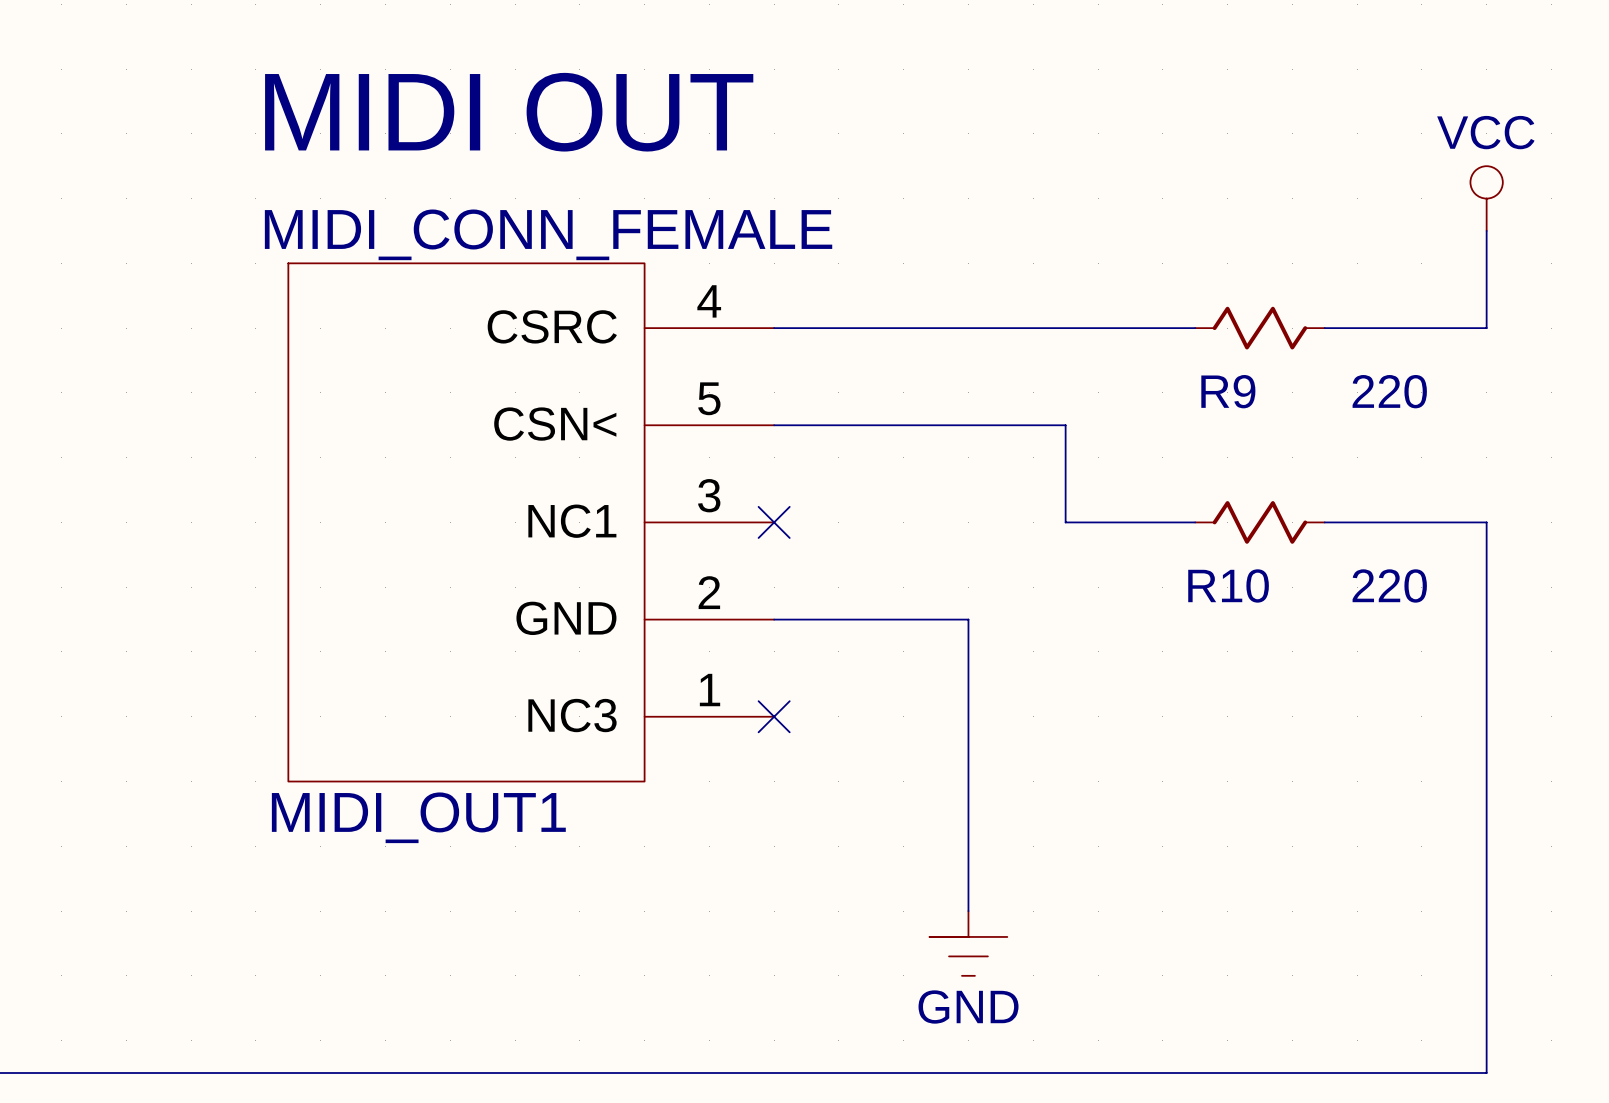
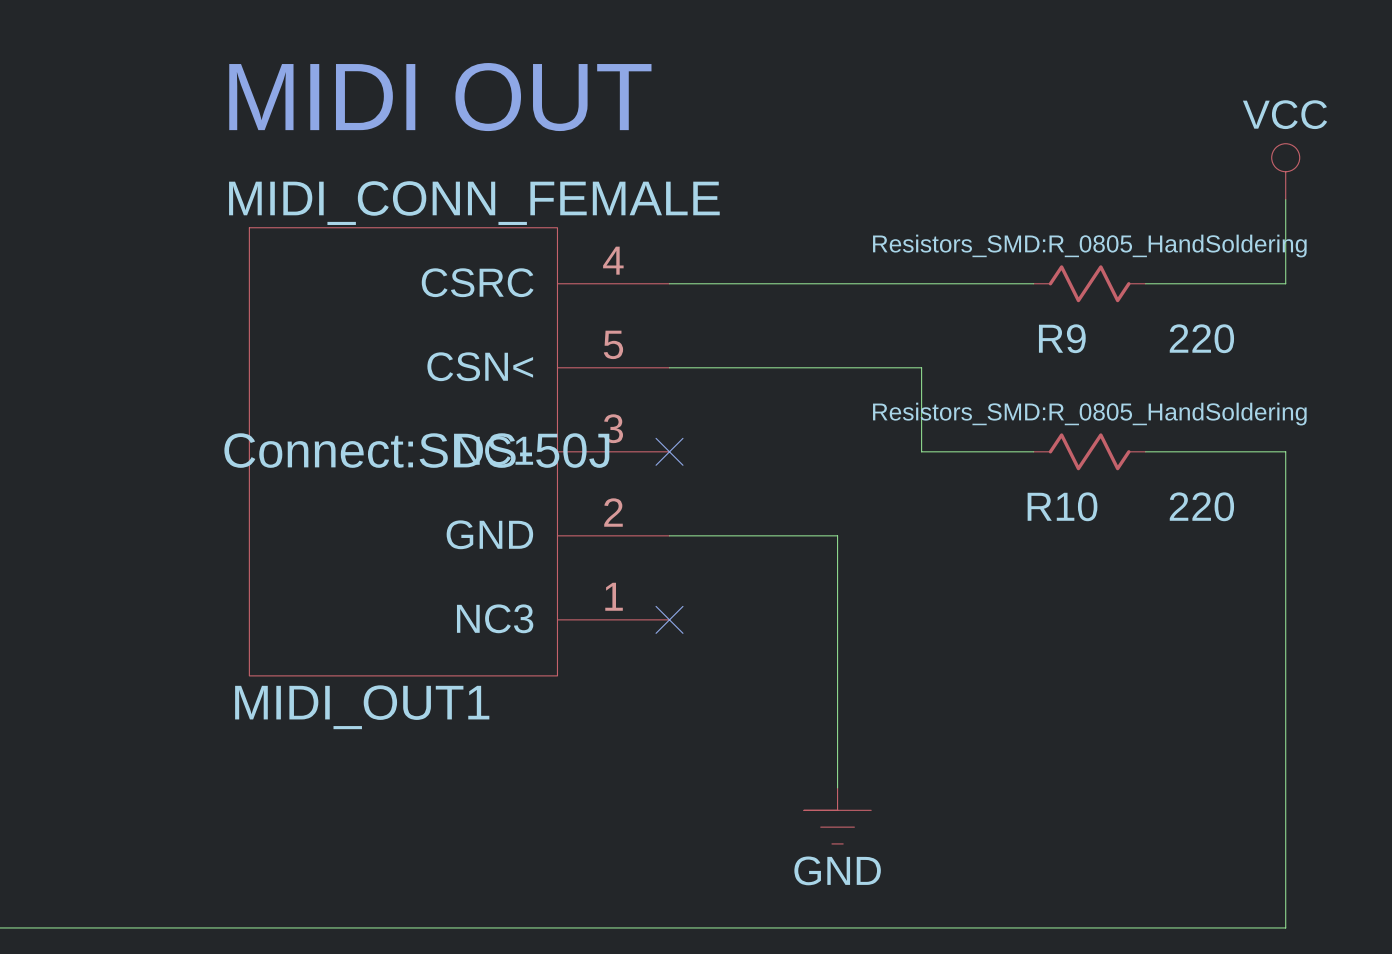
R9 text: none -> Resistors_SMD:R_0805_HandSoldering (1089, 246)
R10 text: none -> Resistors_SMD:R_0805_HandSoldering (1089, 414)
MIDI_OUT1 text: none -> Connect:SDS-50J (416, 450)

